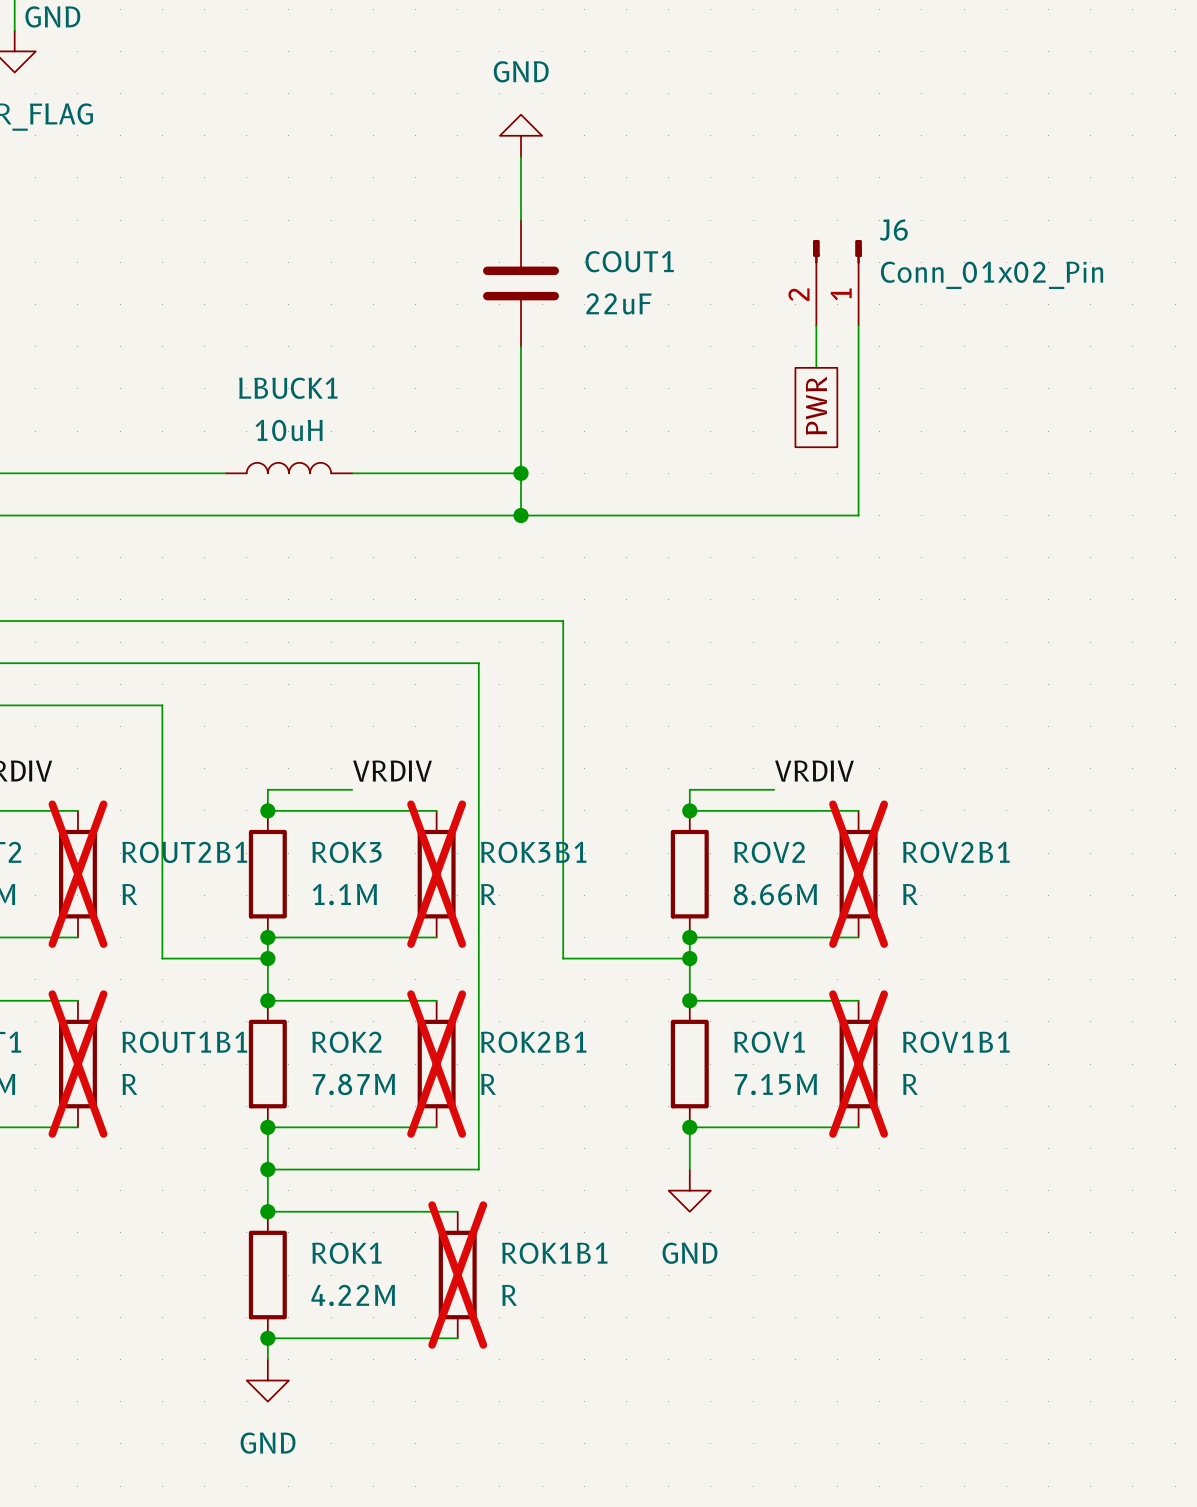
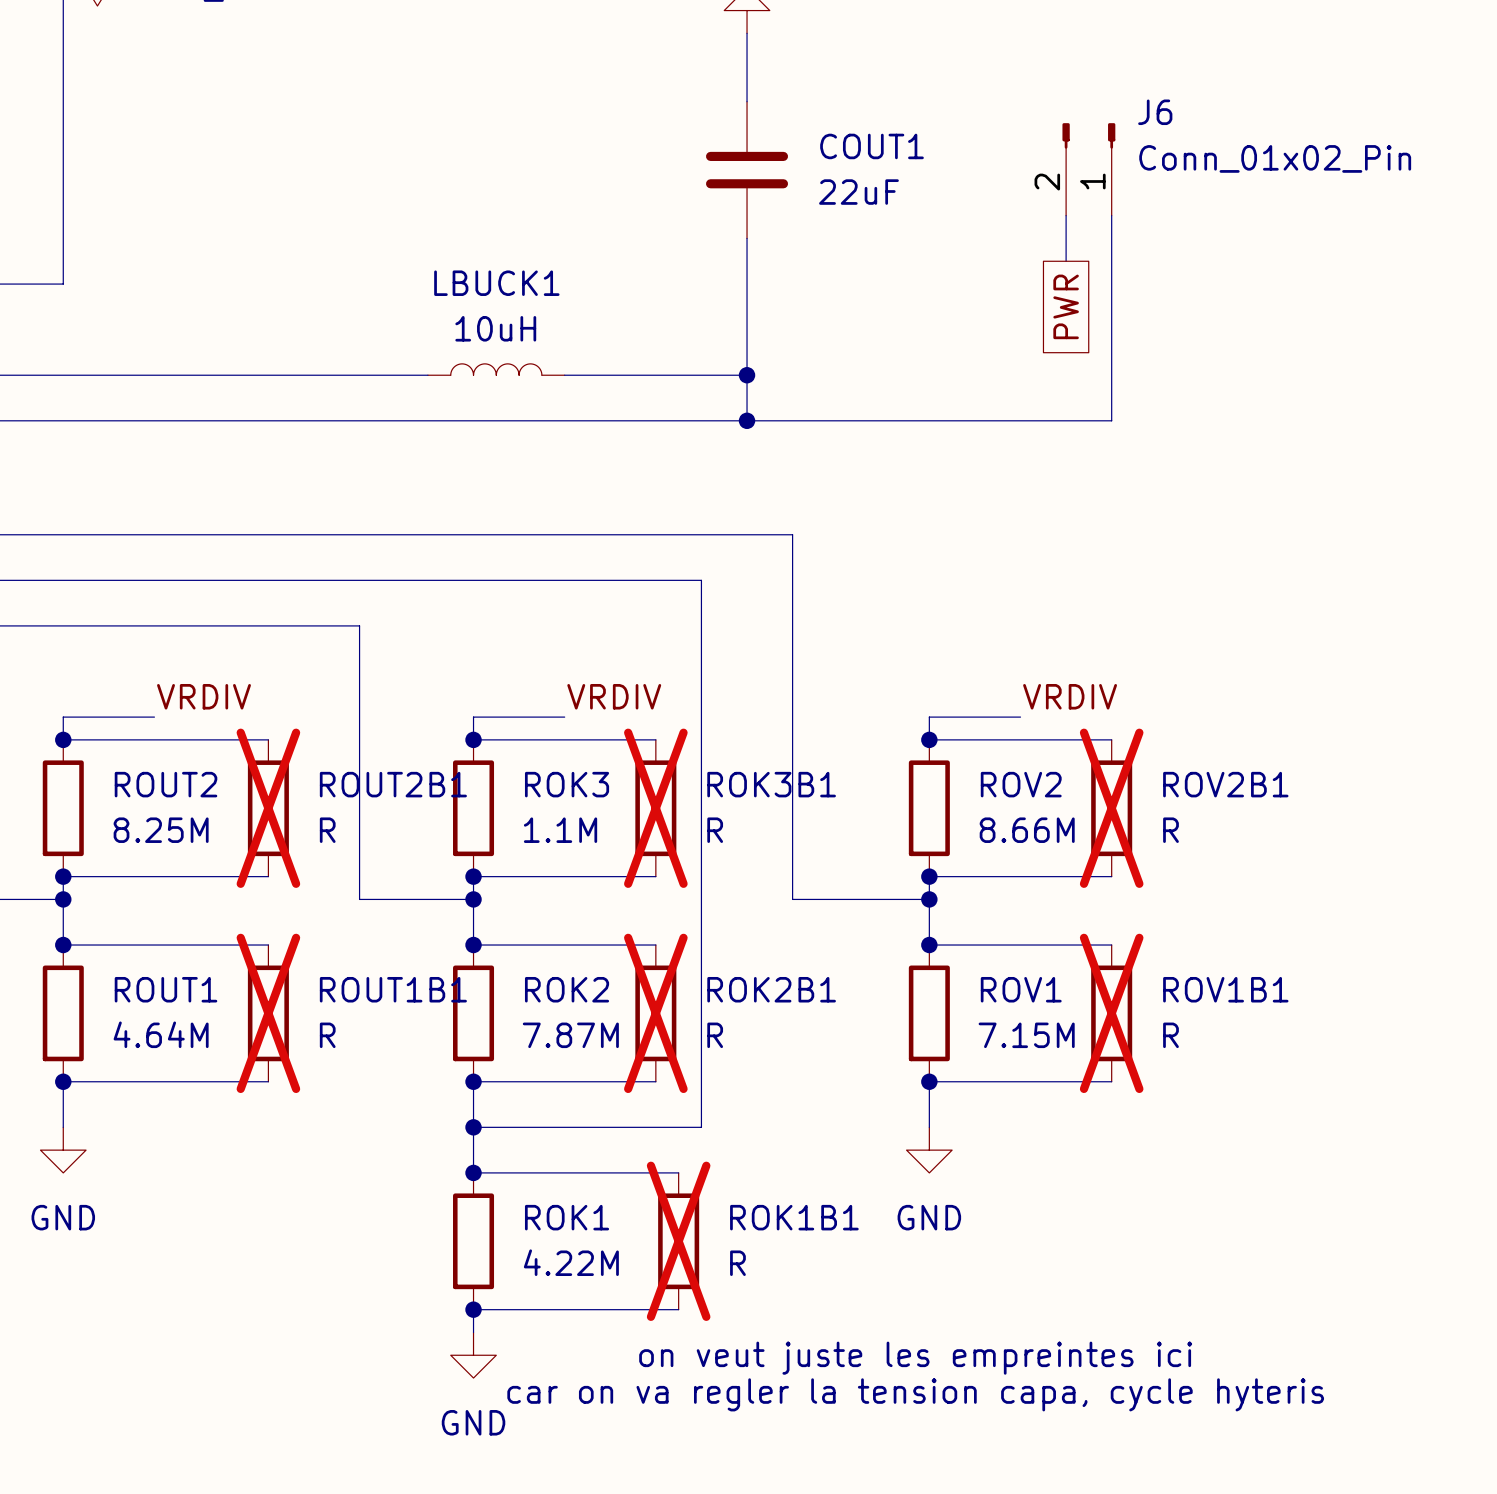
text: none -> on veut juste les empreintes ici (915, 1358)
text: none -> car on va regler la tension capa, cycle hyteris (915, 1394)

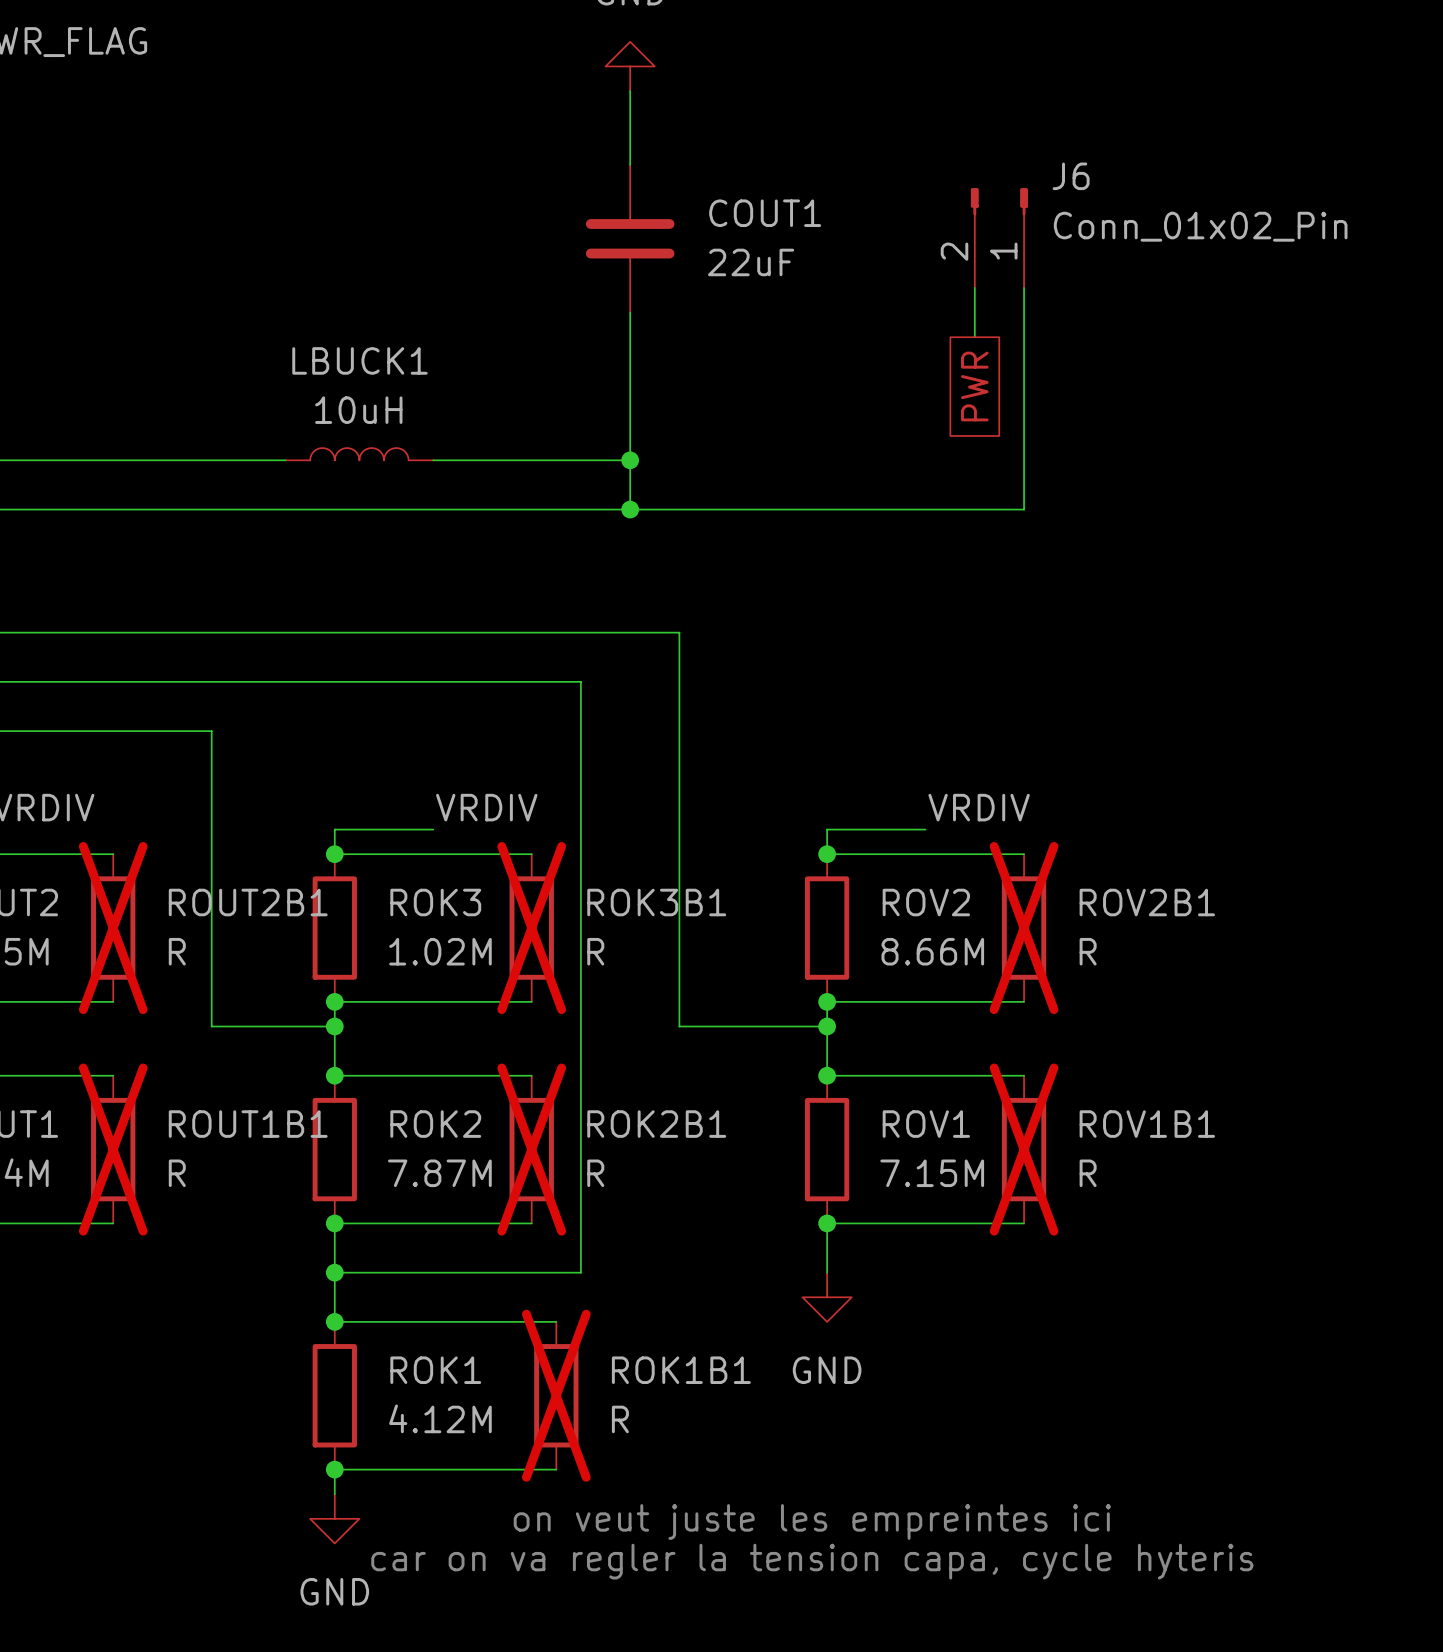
ROK3 value: 1.1M (560, 830) -> 1.02M (440, 951)
ROK1 value: 4.22M (571, 1262) -> 4.12M (440, 1418)

